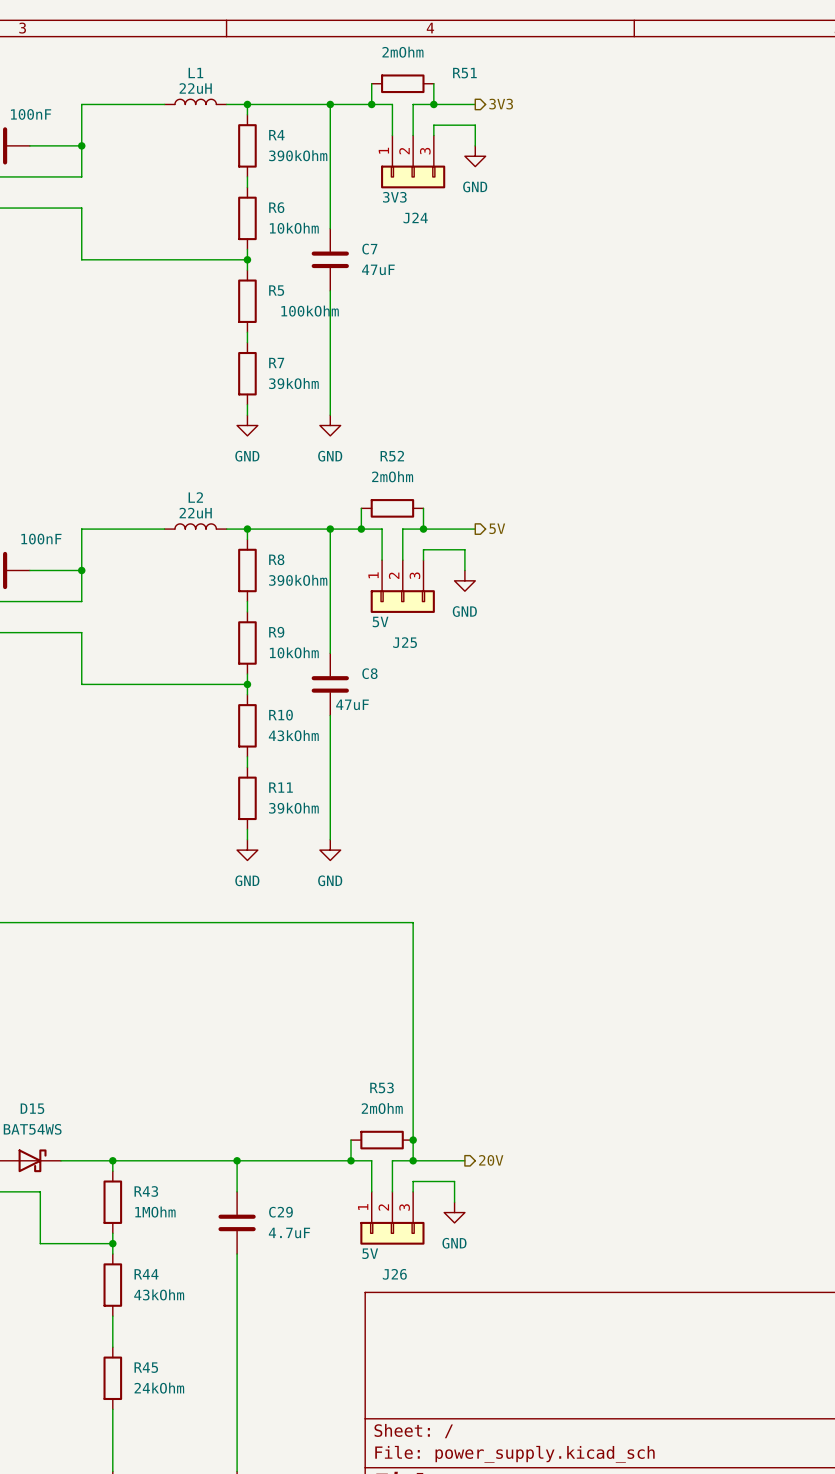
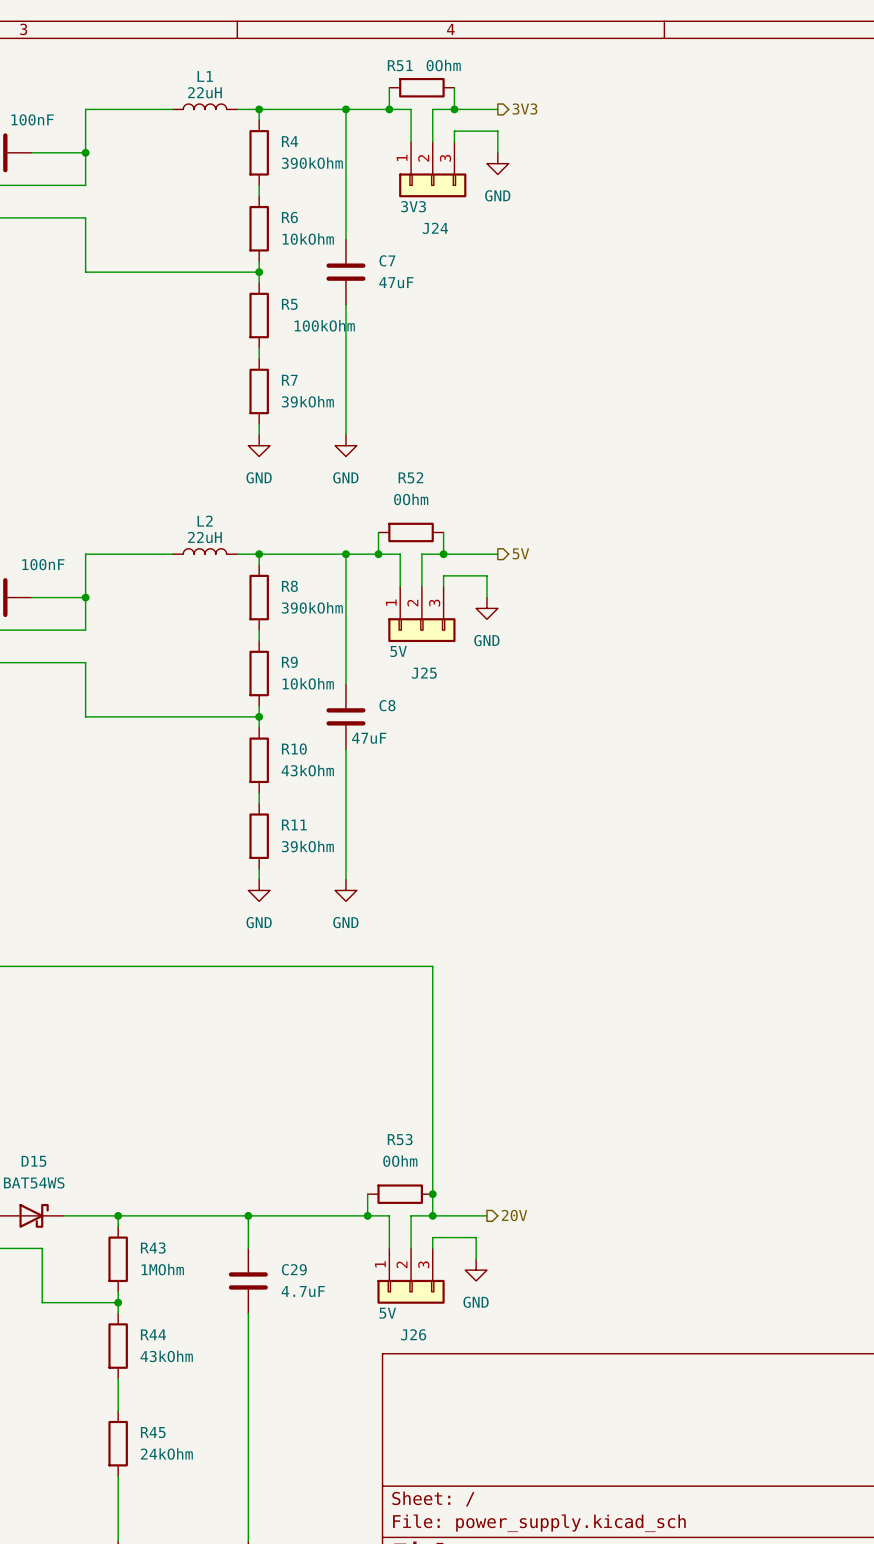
R51 value: 2mOhm (402, 52) -> 0Ohm (443, 65)
R51 name position: R51 (464, 73) -> R51 (400, 65)
R52 value: 2mOhm (392, 476) -> 0Ohm (411, 499)
R53 value: 2mOhm (382, 1108) -> 0Ohm (400, 1161)

